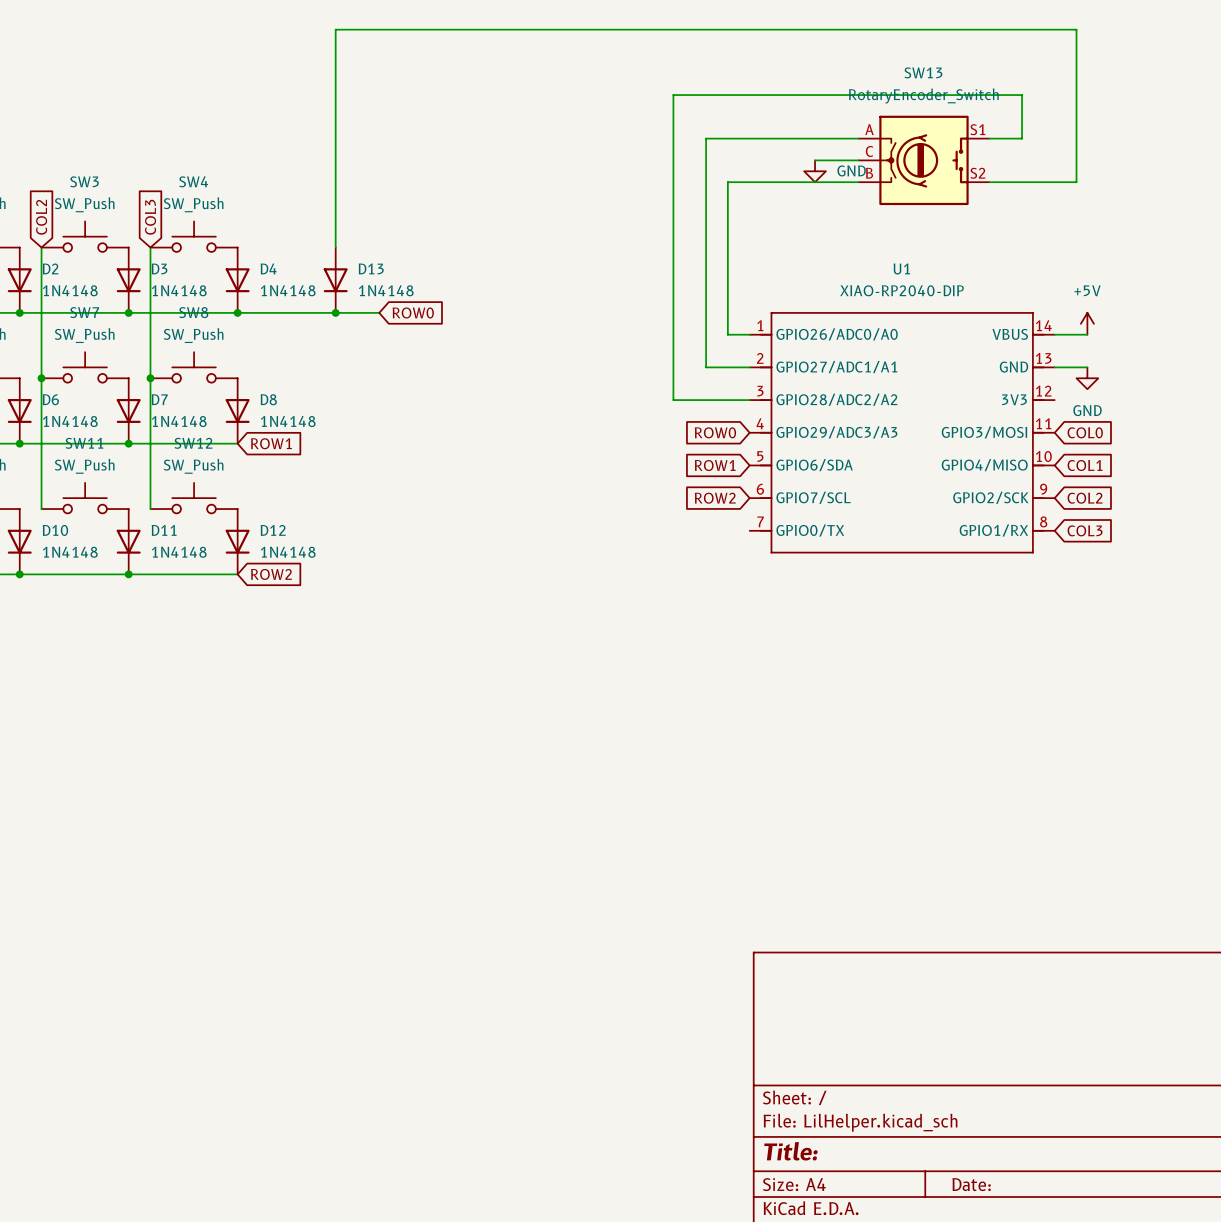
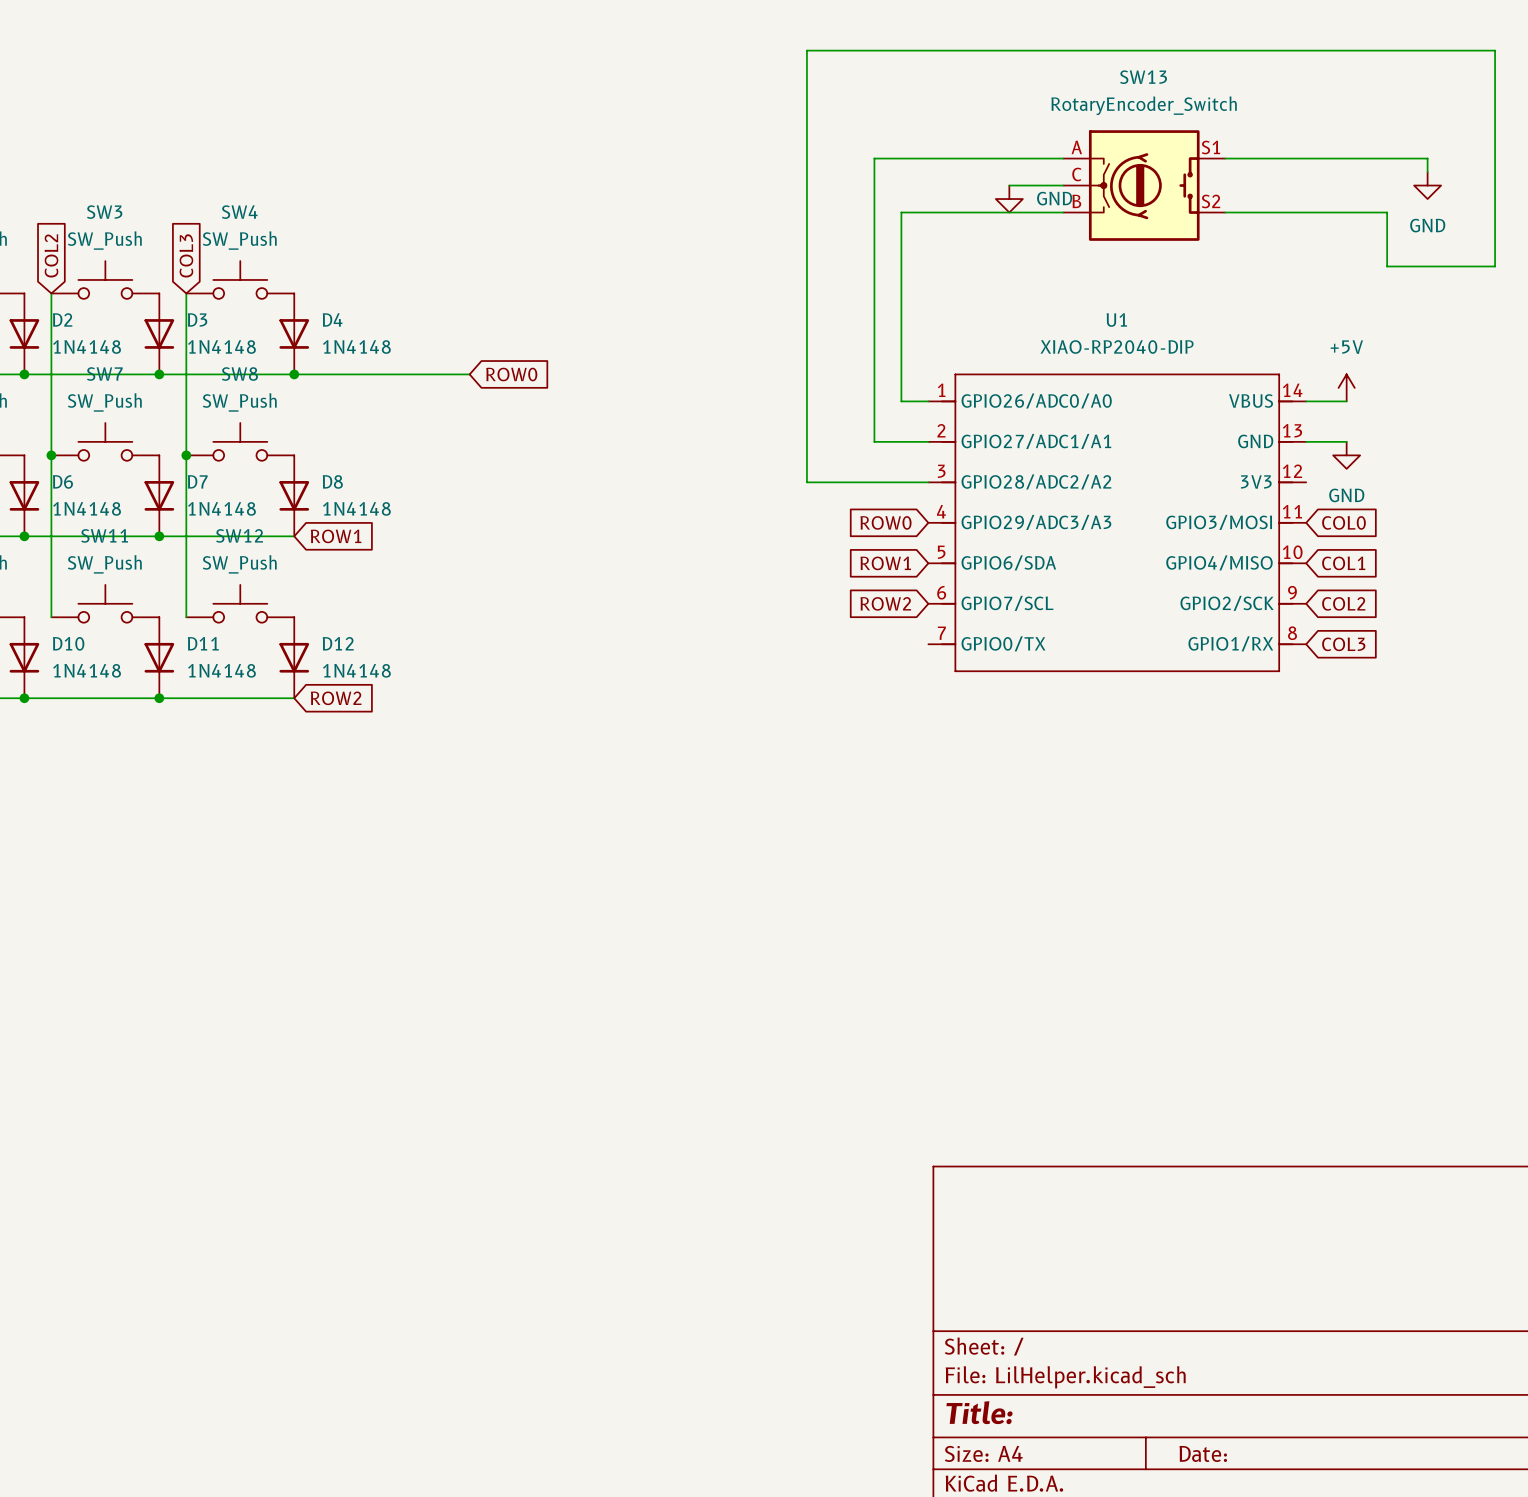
wire: (1022, 138) (1022, 95) (673, 95) (673, 400) -> (1333, 212) (1387, 212) (1387, 266) (1495, 266) (1495, 50) (806, 50) (806, 482) (833, 482)
wire: none -> (1265, 158) (1427, 158) (1427, 172)
power symbol: none -> GND (1427, 185)
wire: (1076, 182) (1076, 29) (335, 29) (335, 247) -> none
D13: 1N4148 (335, 280) -> none
junction: (335, 312) -> none

